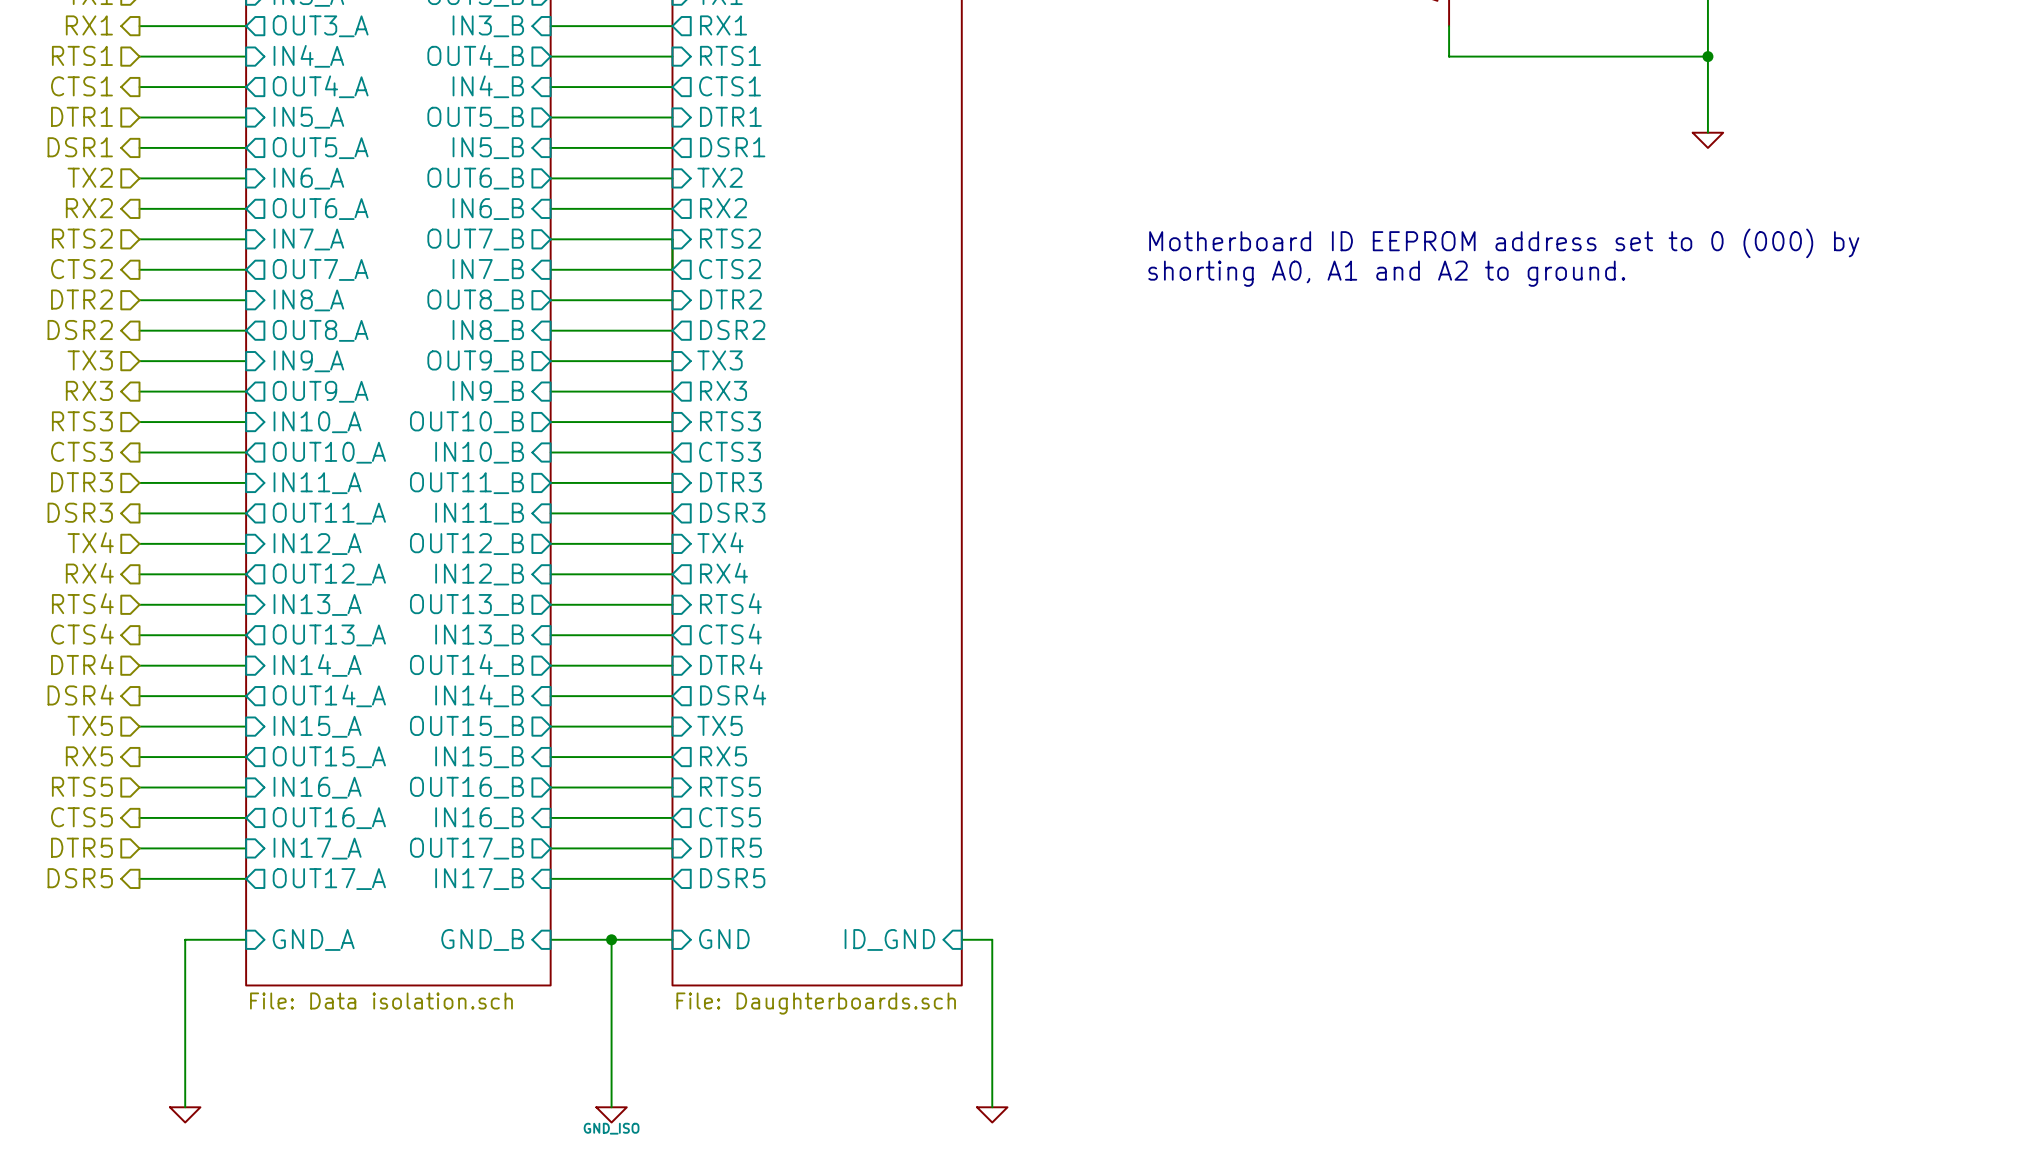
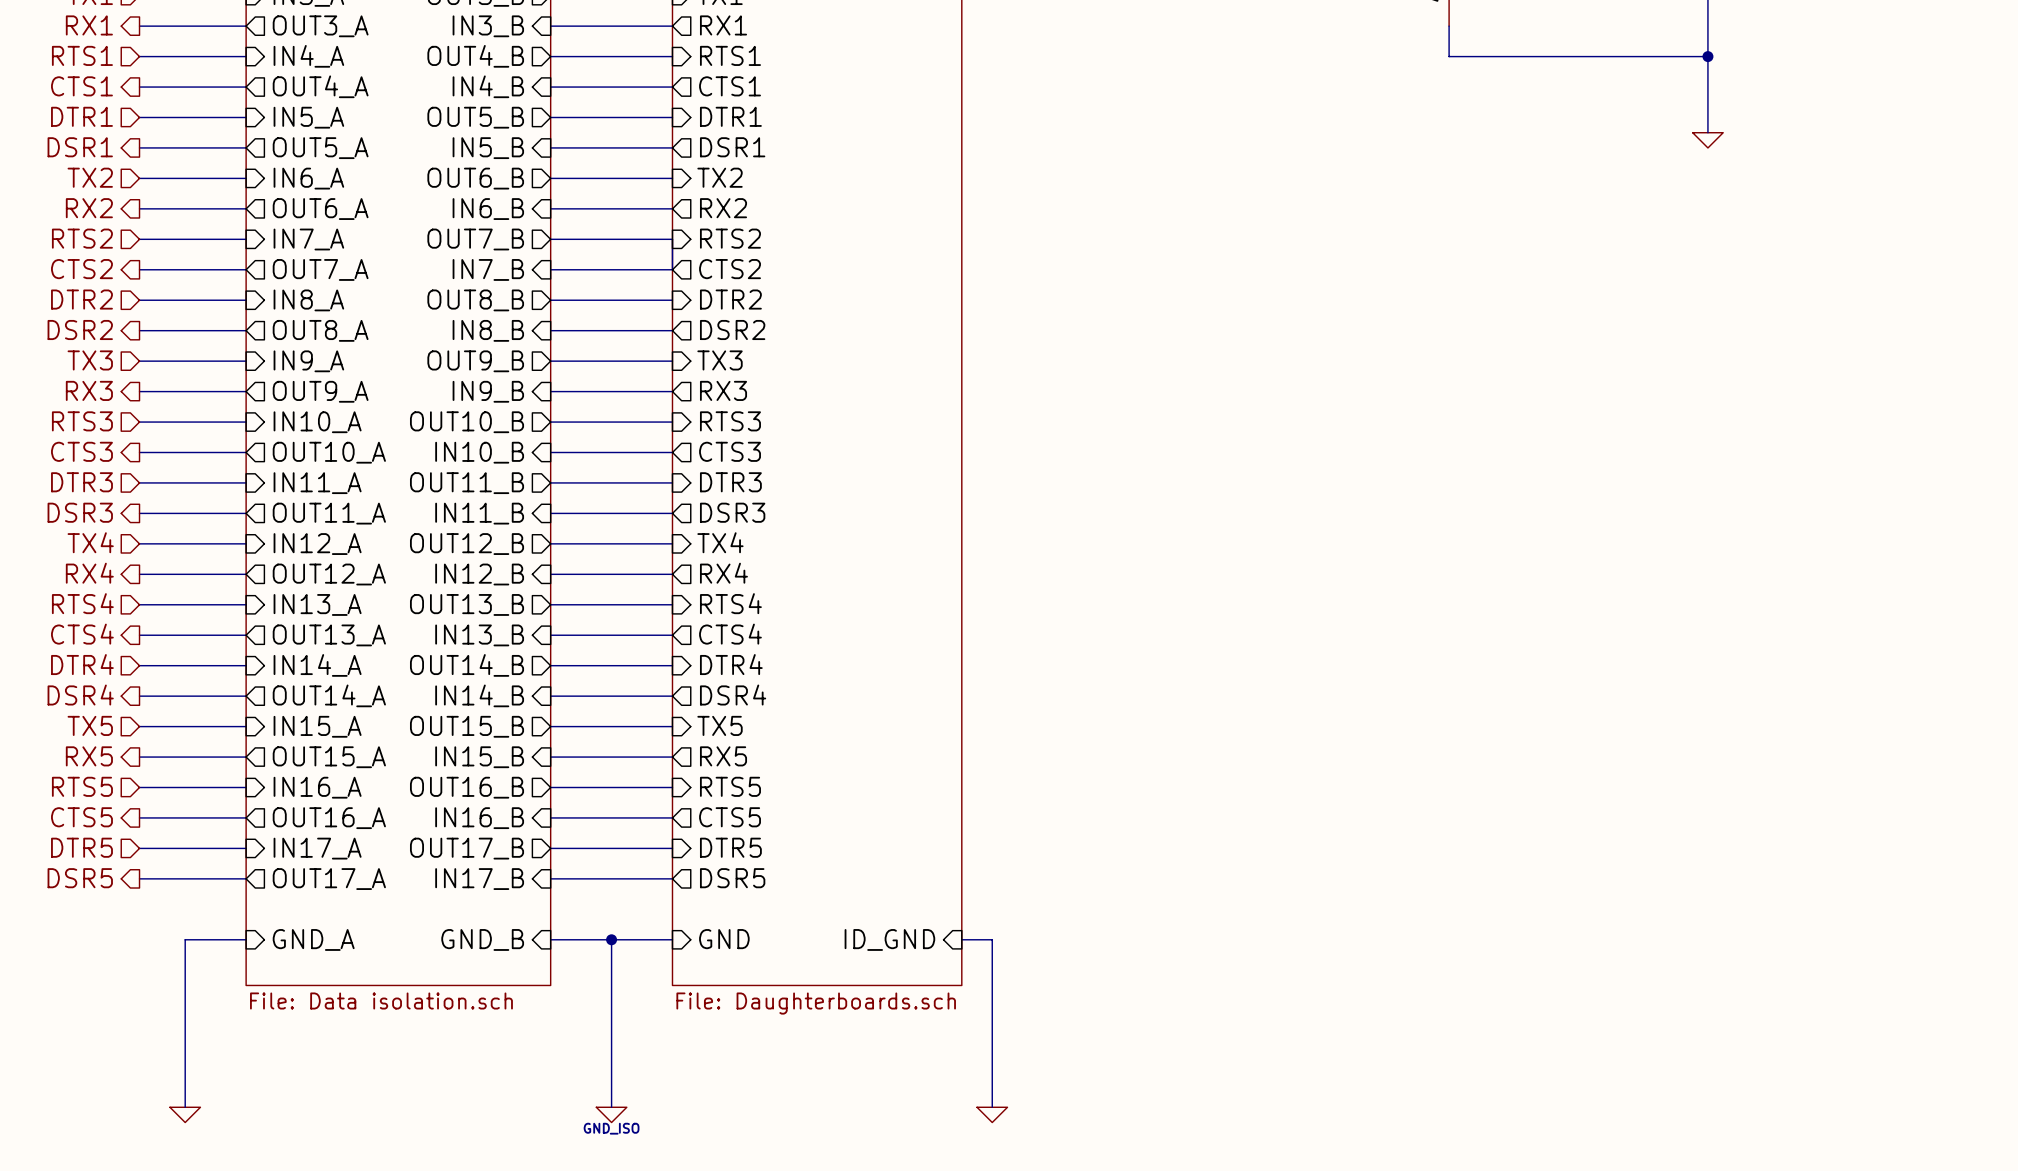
text: Motherboard ID EEPROM address set to 0 (000) by (1504, 243) -> none
text: shorting A0, A1 and A2 to ground. (1386, 273) -> none

